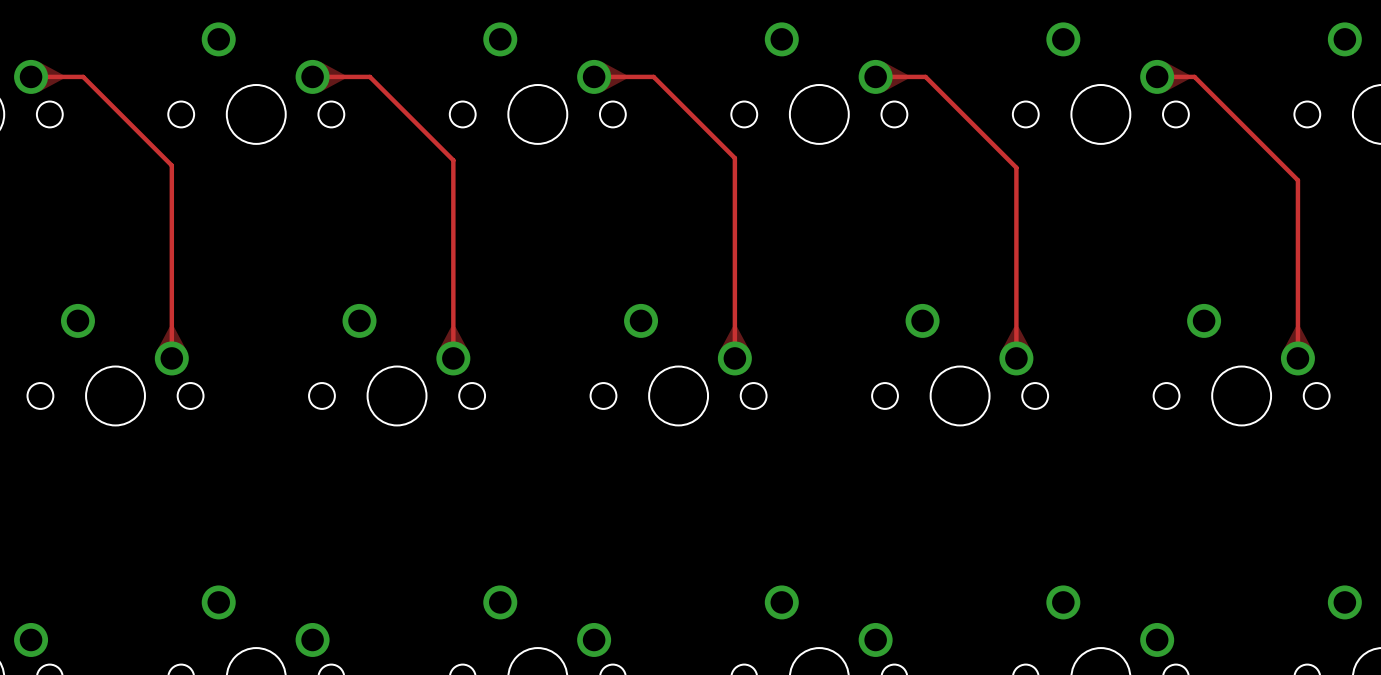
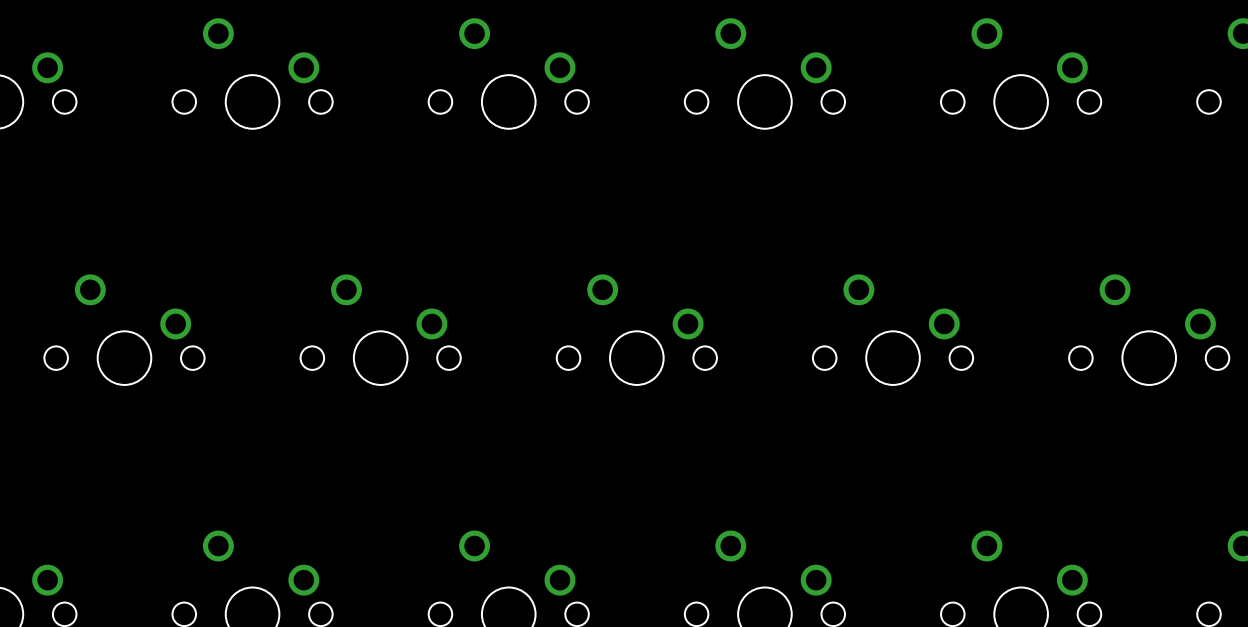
top track: (31, 76) (83, 76) (171, 165) (171, 358) -> none
top track: (312, 76) (369, 76) (453, 160) (453, 358) -> none
top track: (594, 76) (653, 76) (734, 158) (734, 358) -> none
top track: (875, 76) (925, 76) (1016, 167) (1016, 358) -> none
top track: (1157, 76) (1194, 76) (1297, 180) (1297, 358) -> none

